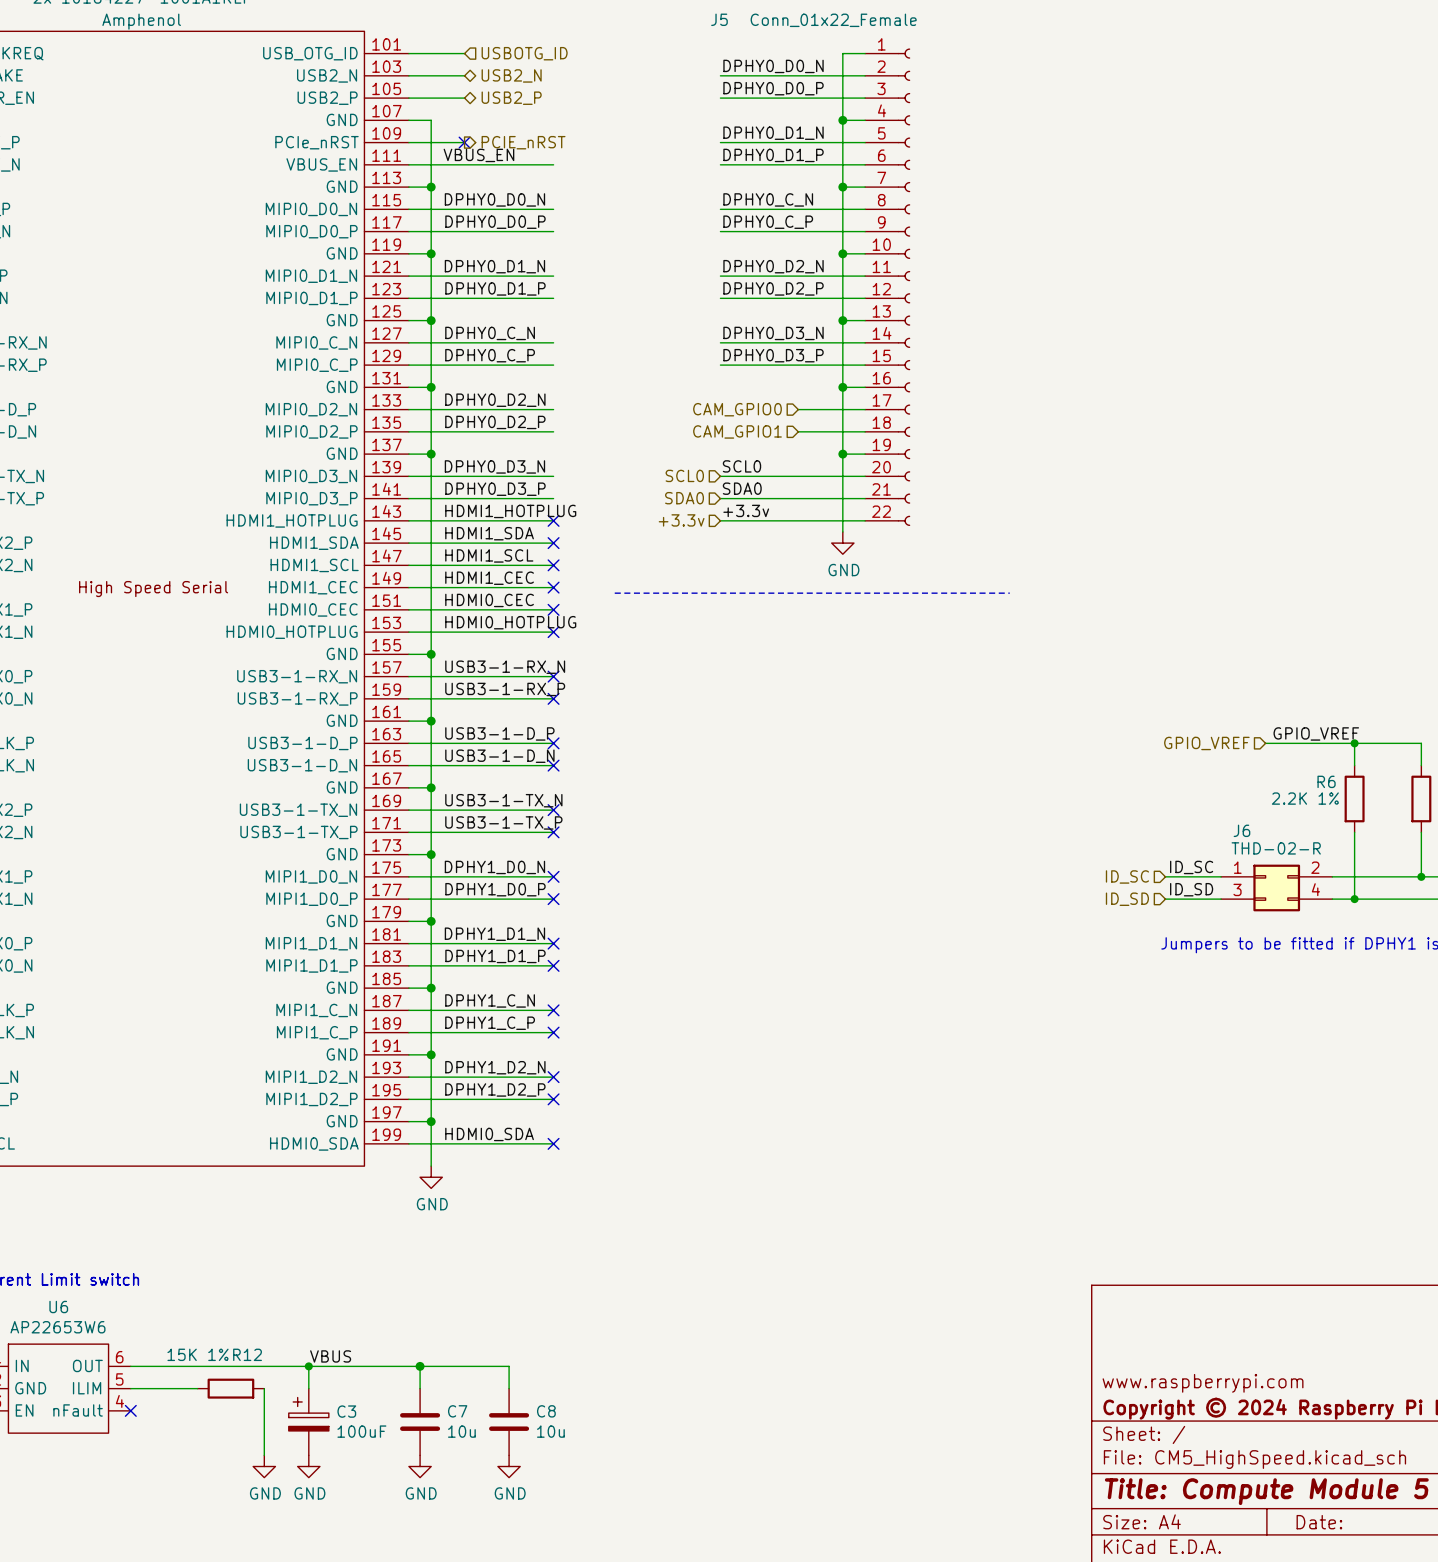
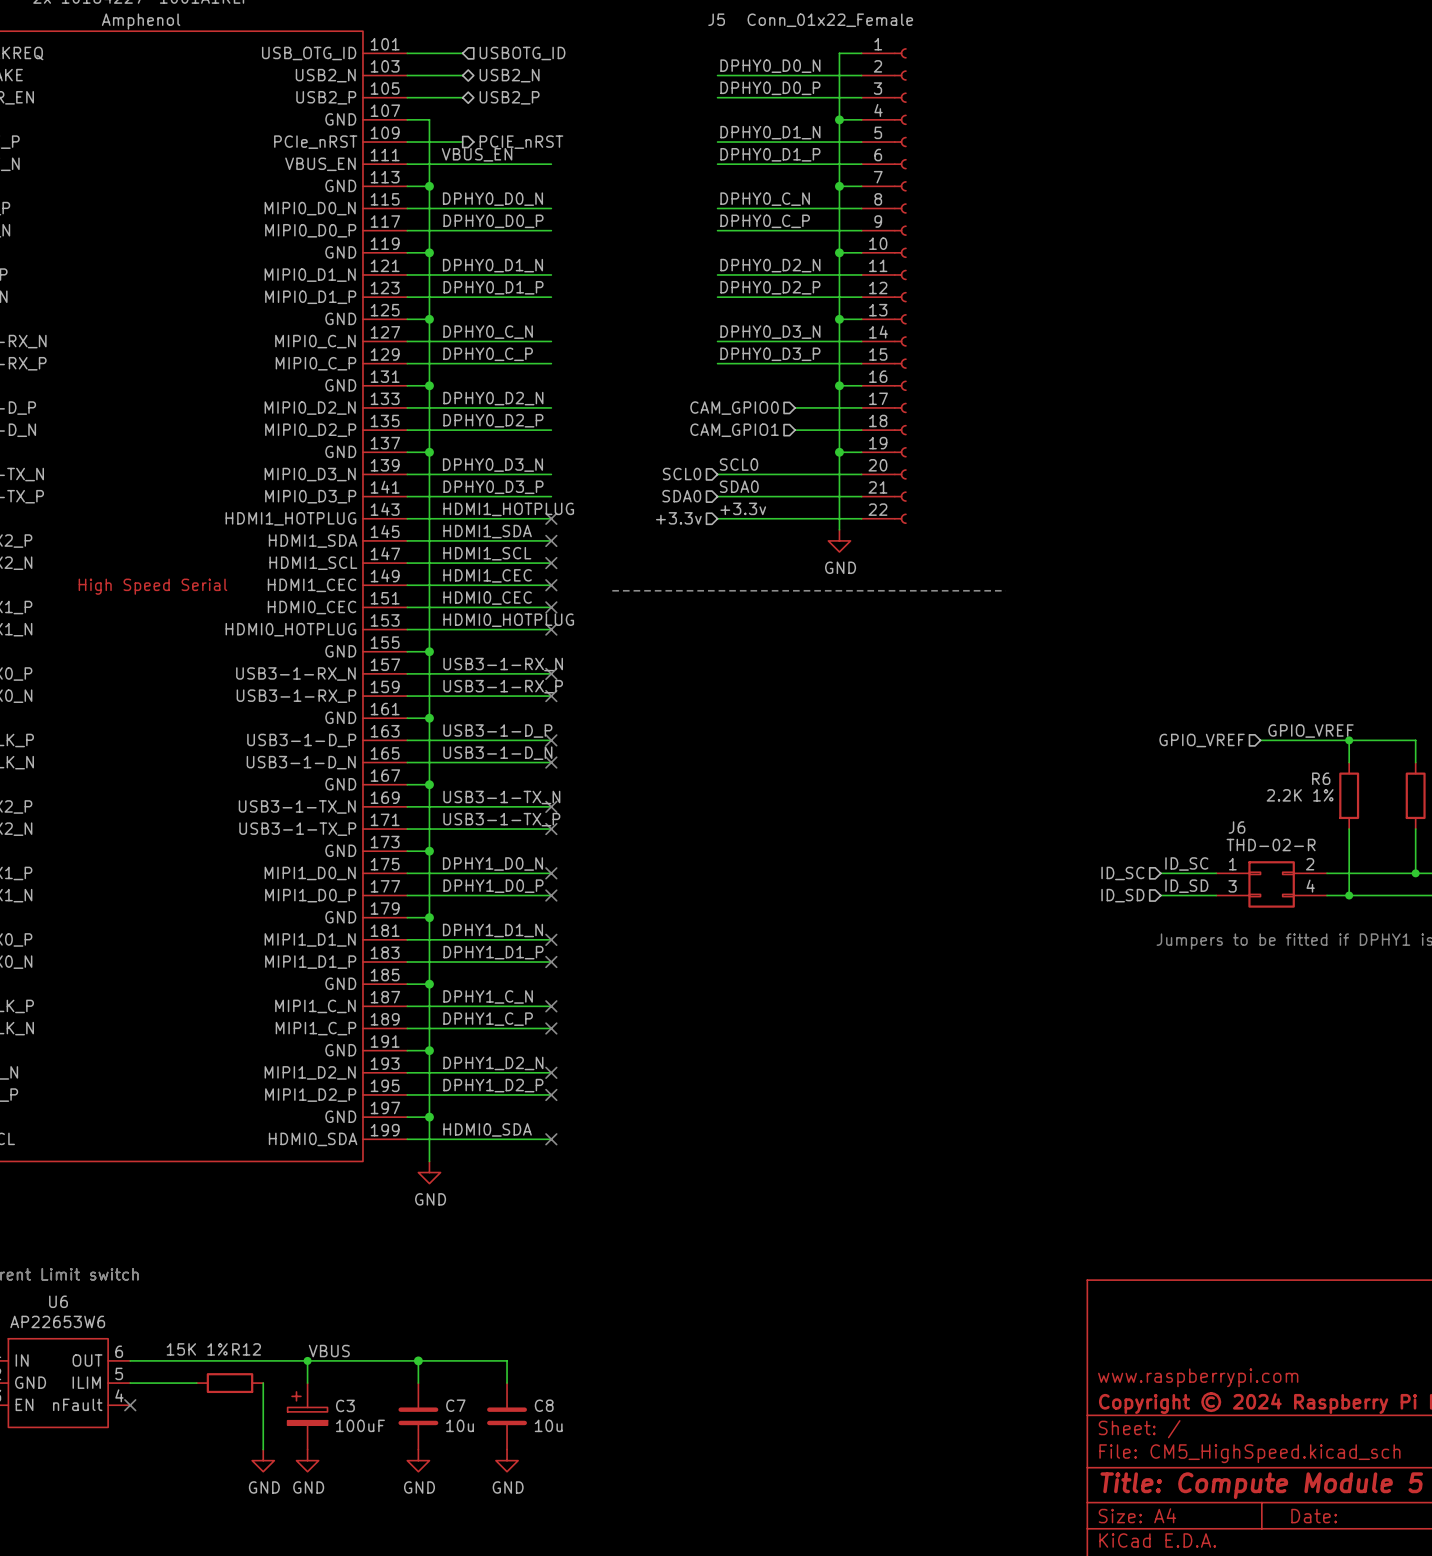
no-connect mark: (464, 142) -> none

